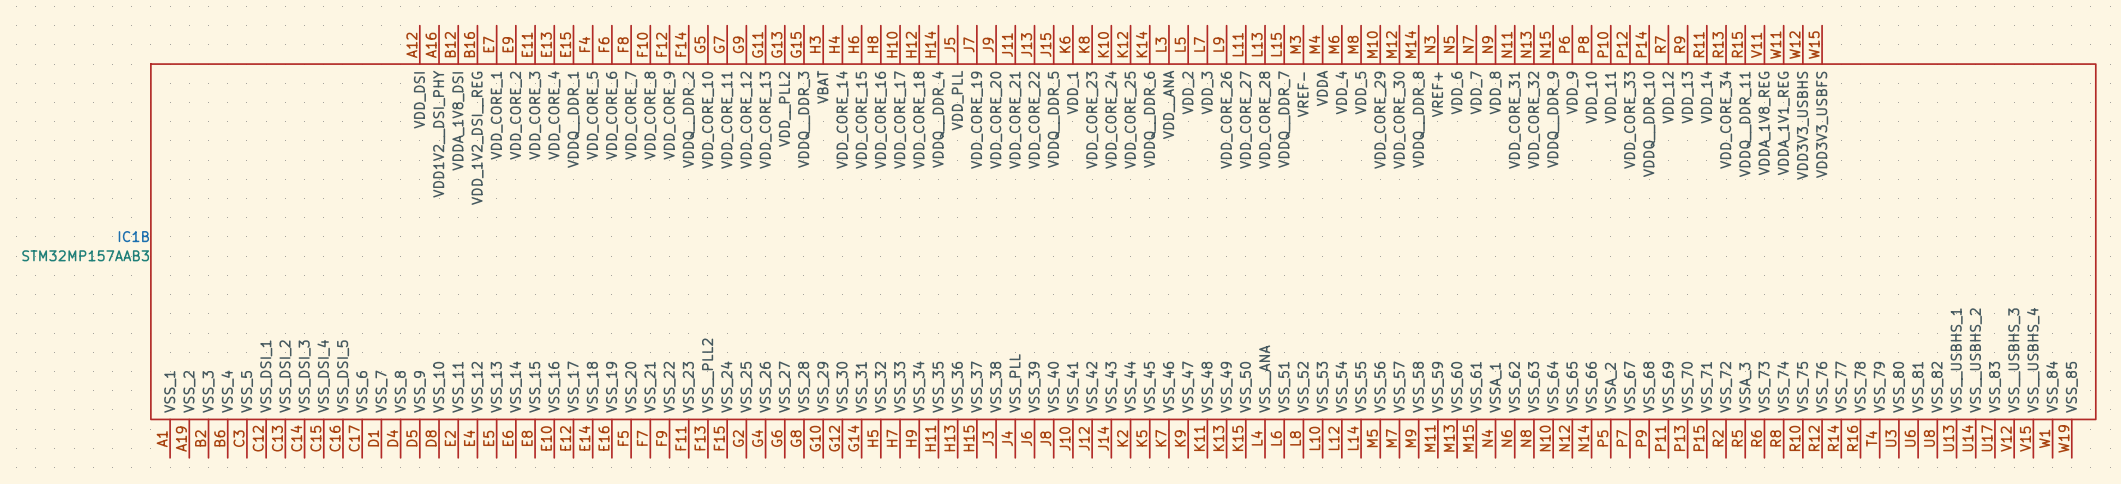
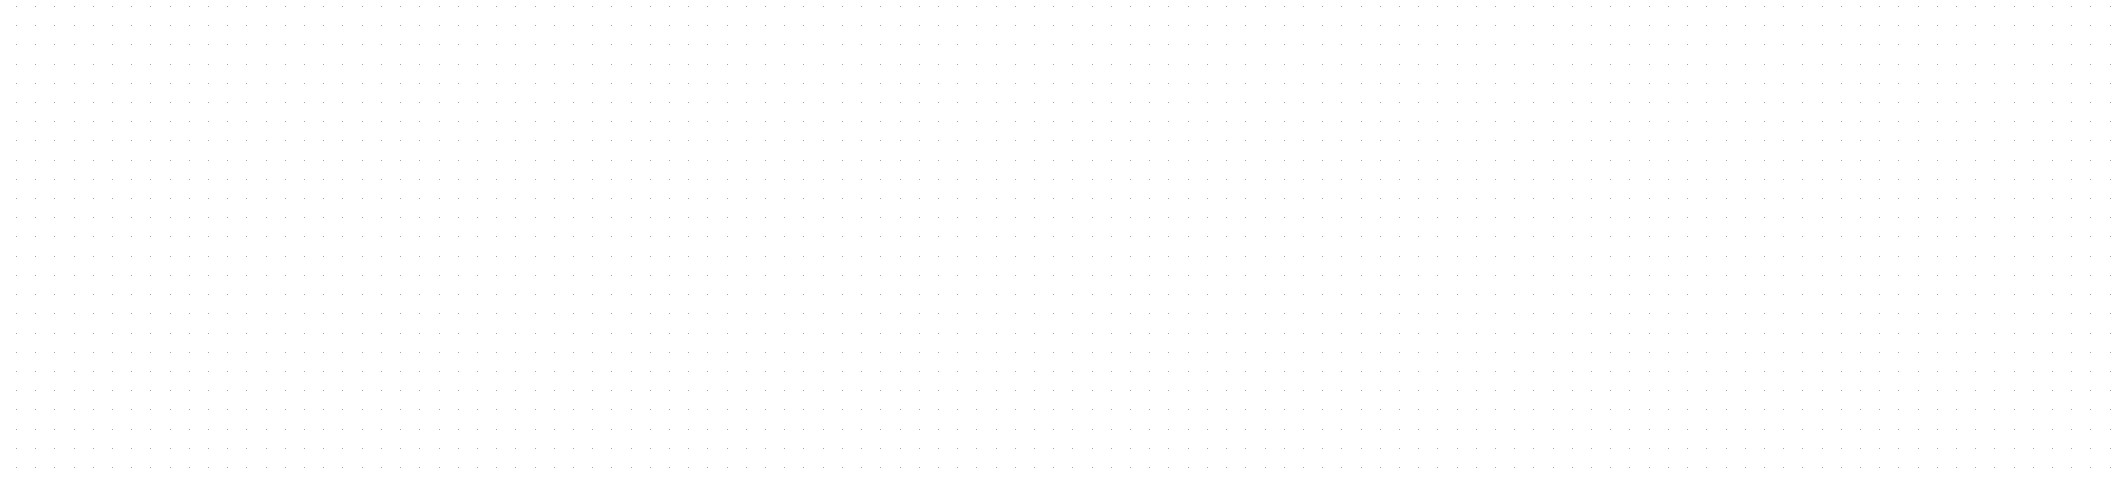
IC1B: STM32MP157AAB3 (1123, 241) -> none

